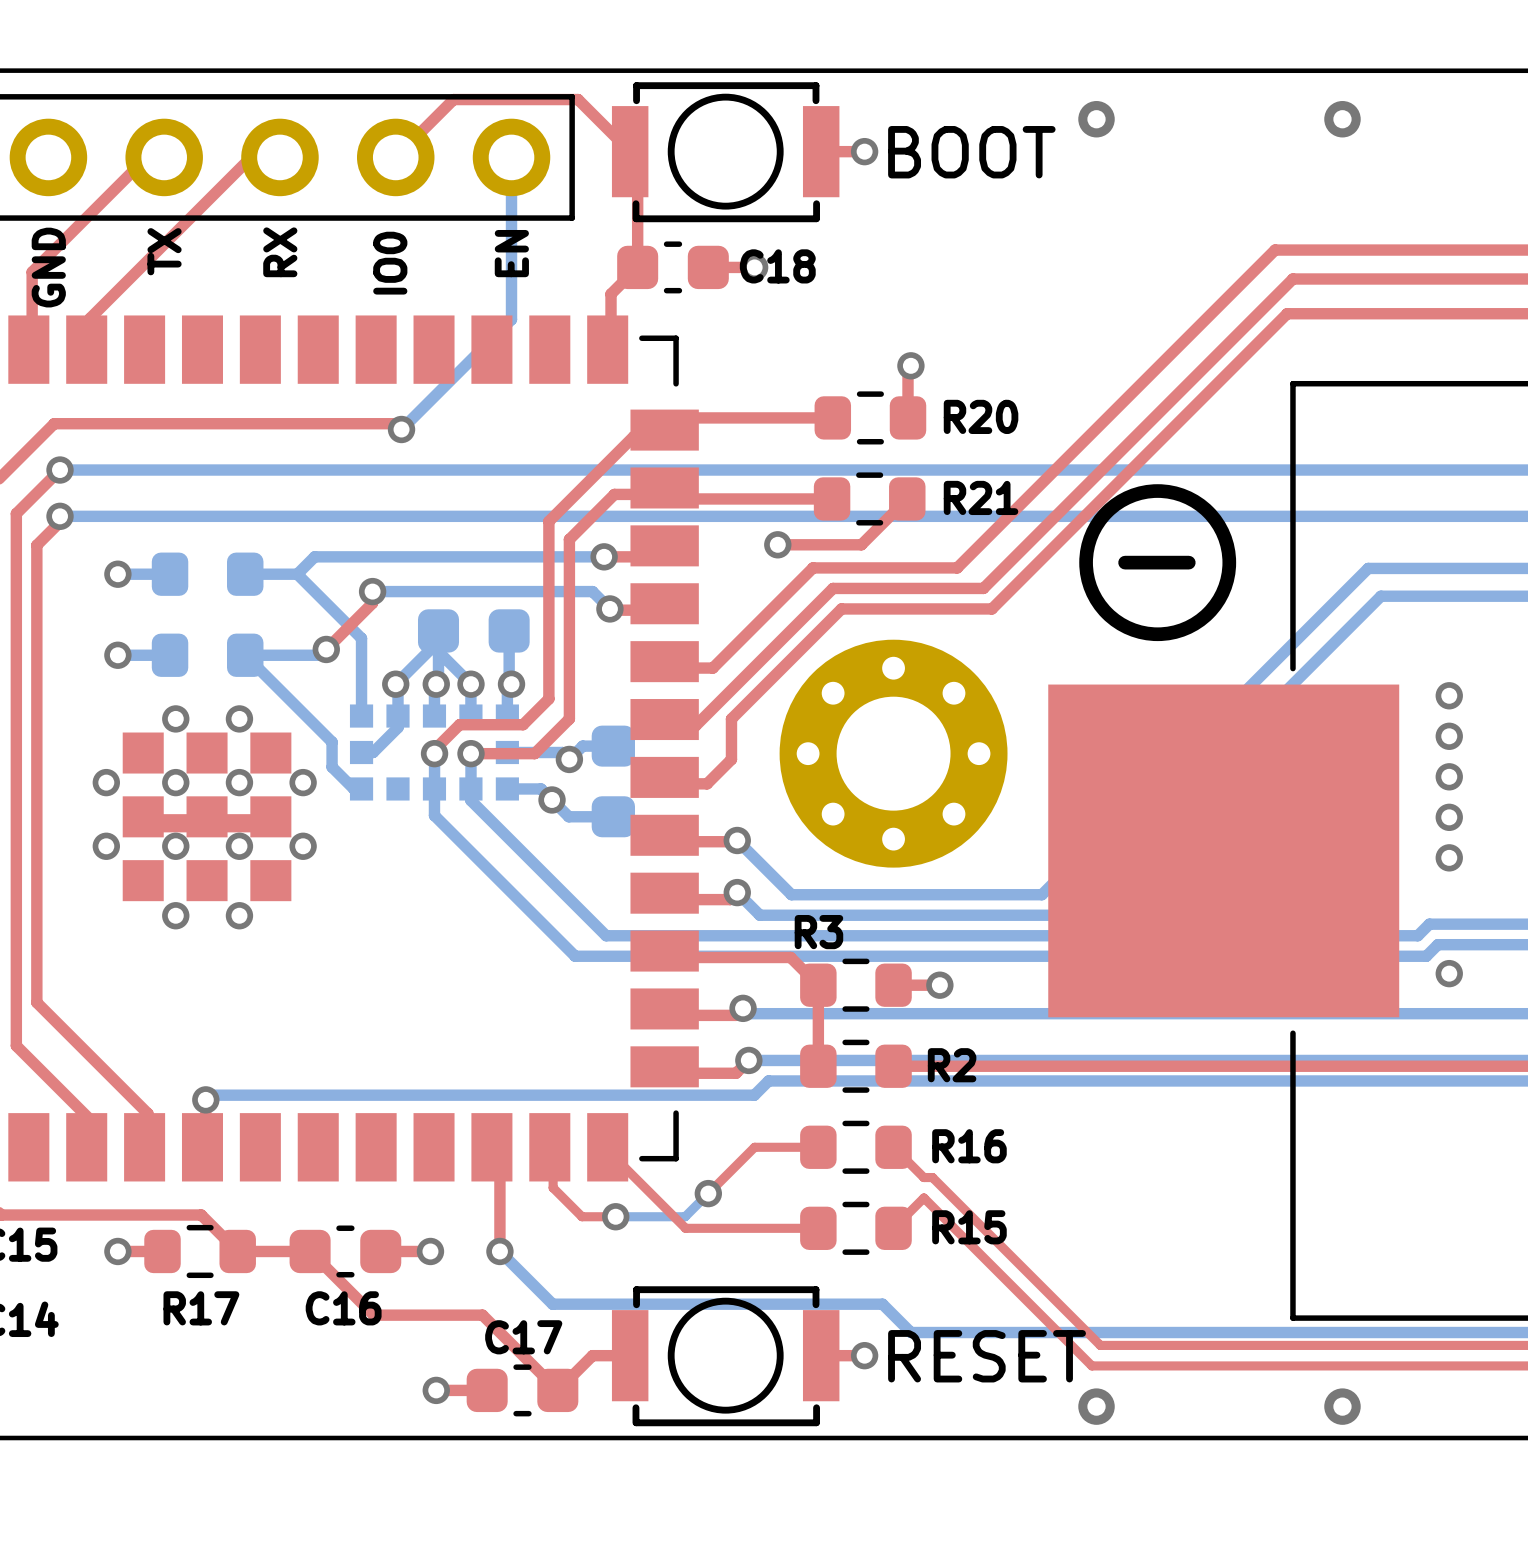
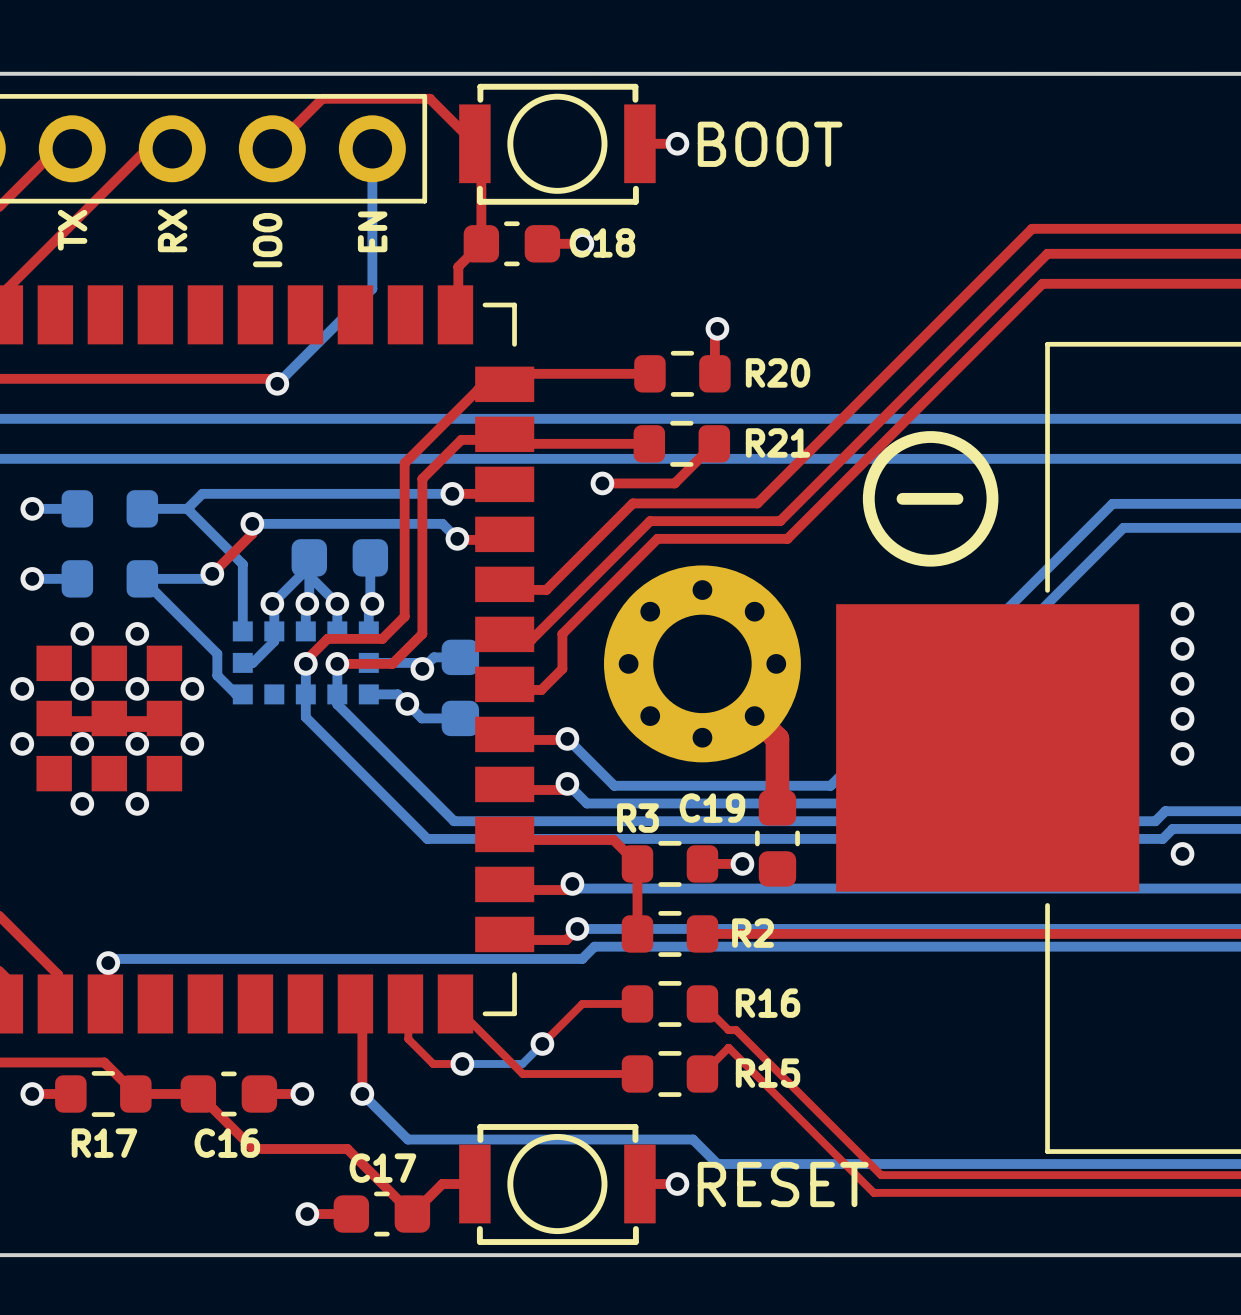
via: (1096, 119) -> none
via: (1342, 119) -> none
top track: none -> (754, 716) (777, 738) (777, 807)
C19: none -> (777, 838)
via: (1096, 1406) -> none
via: (1342, 1406) -> none

